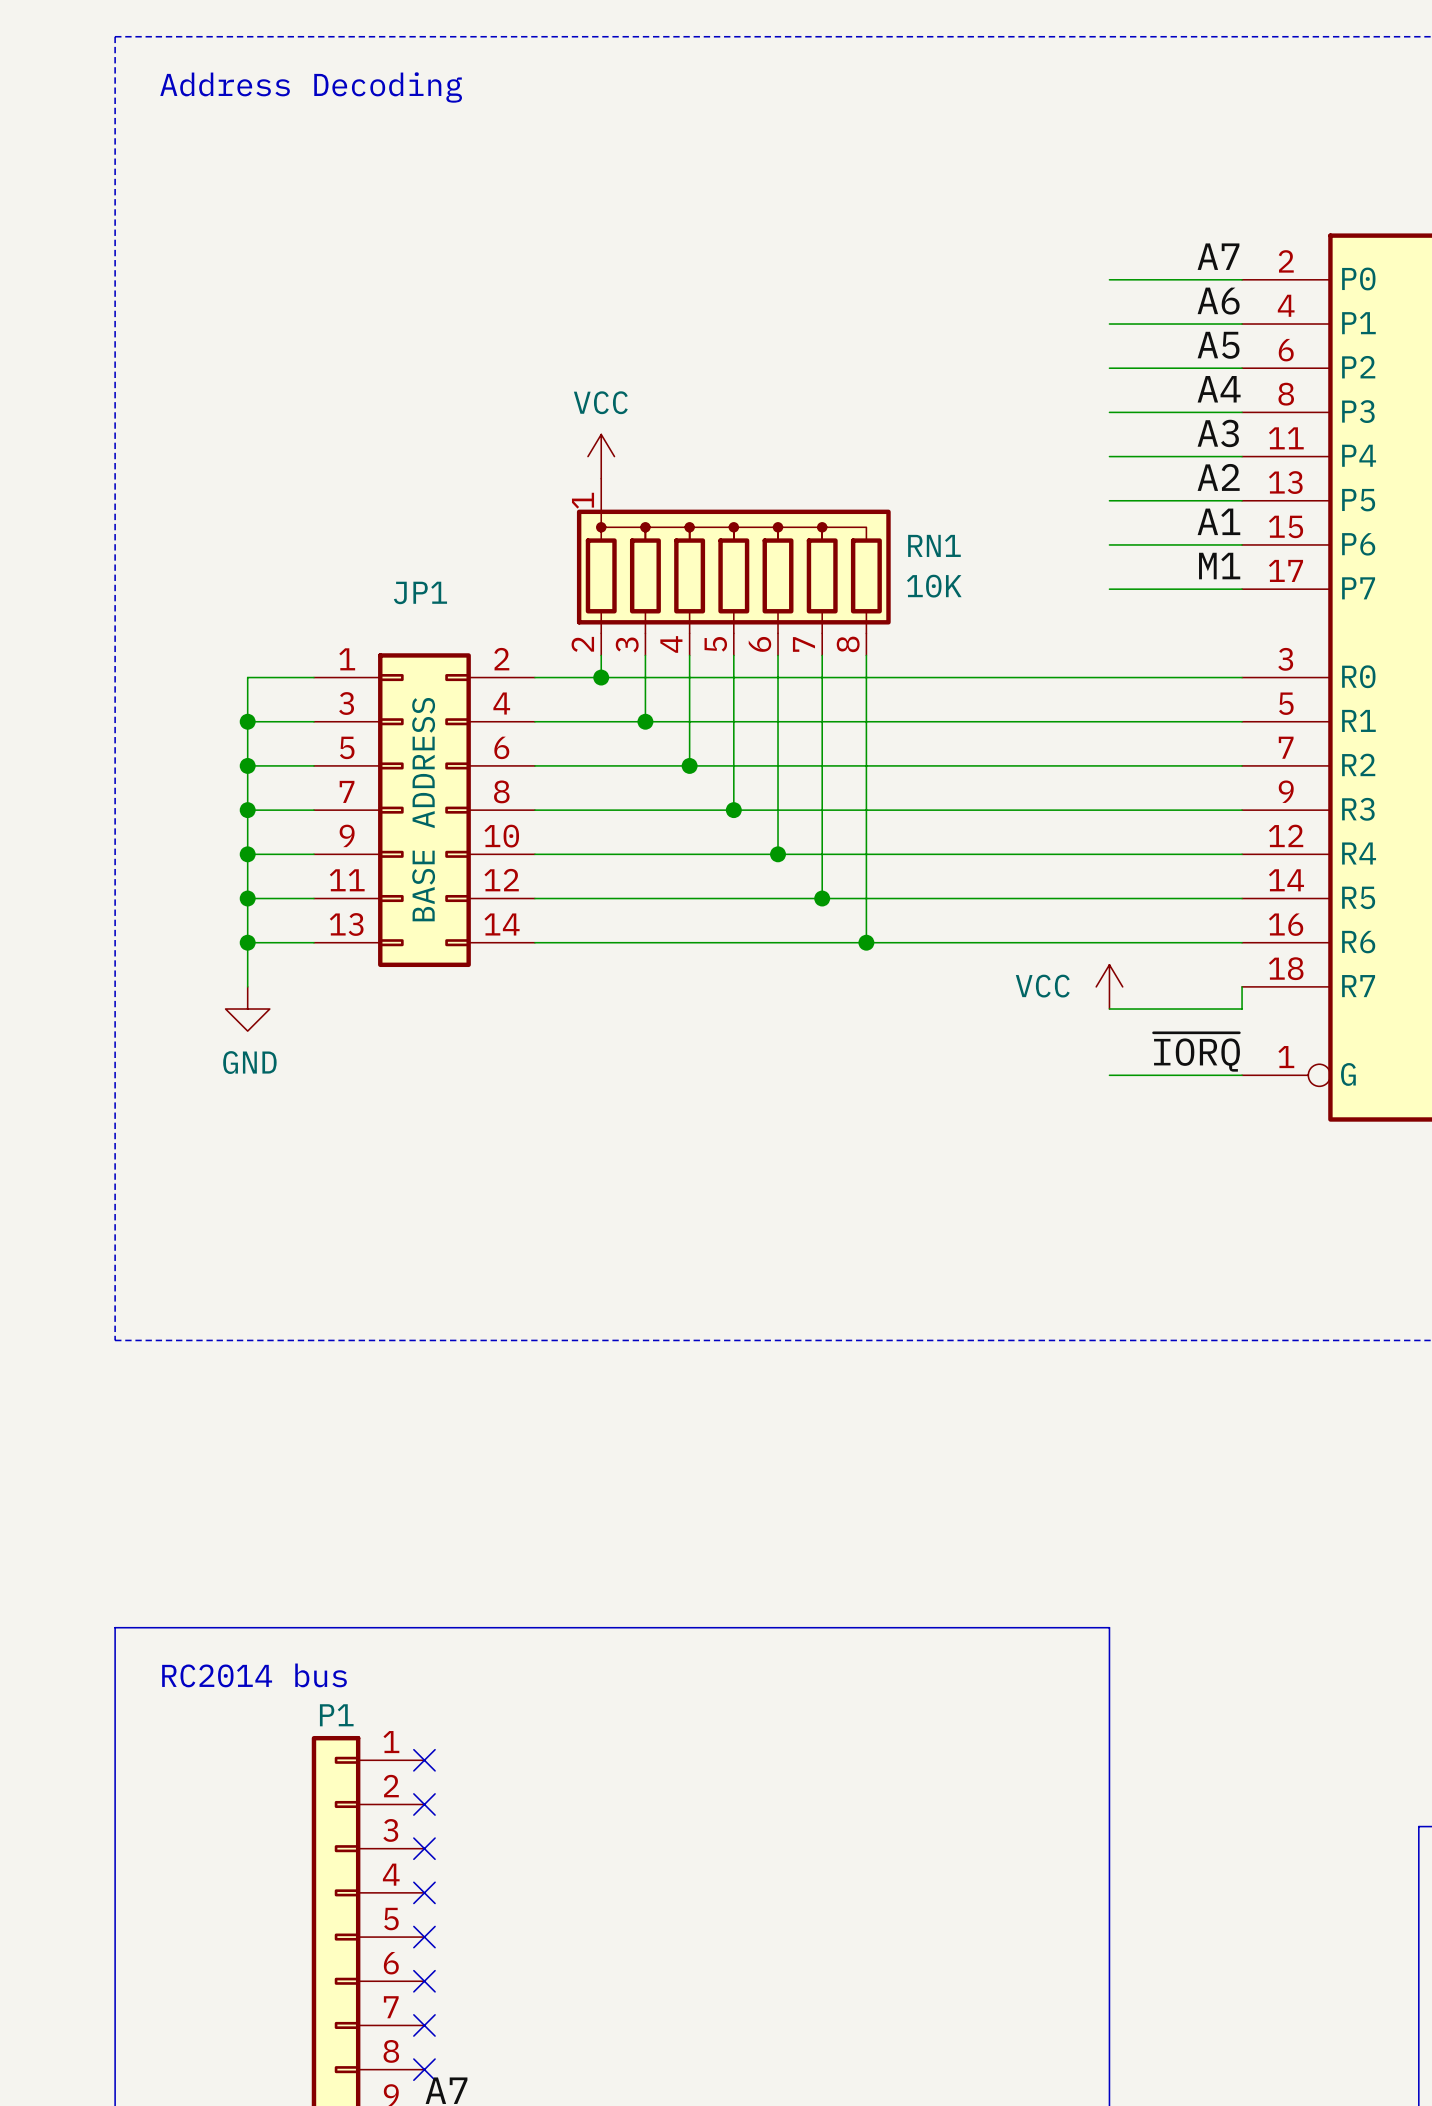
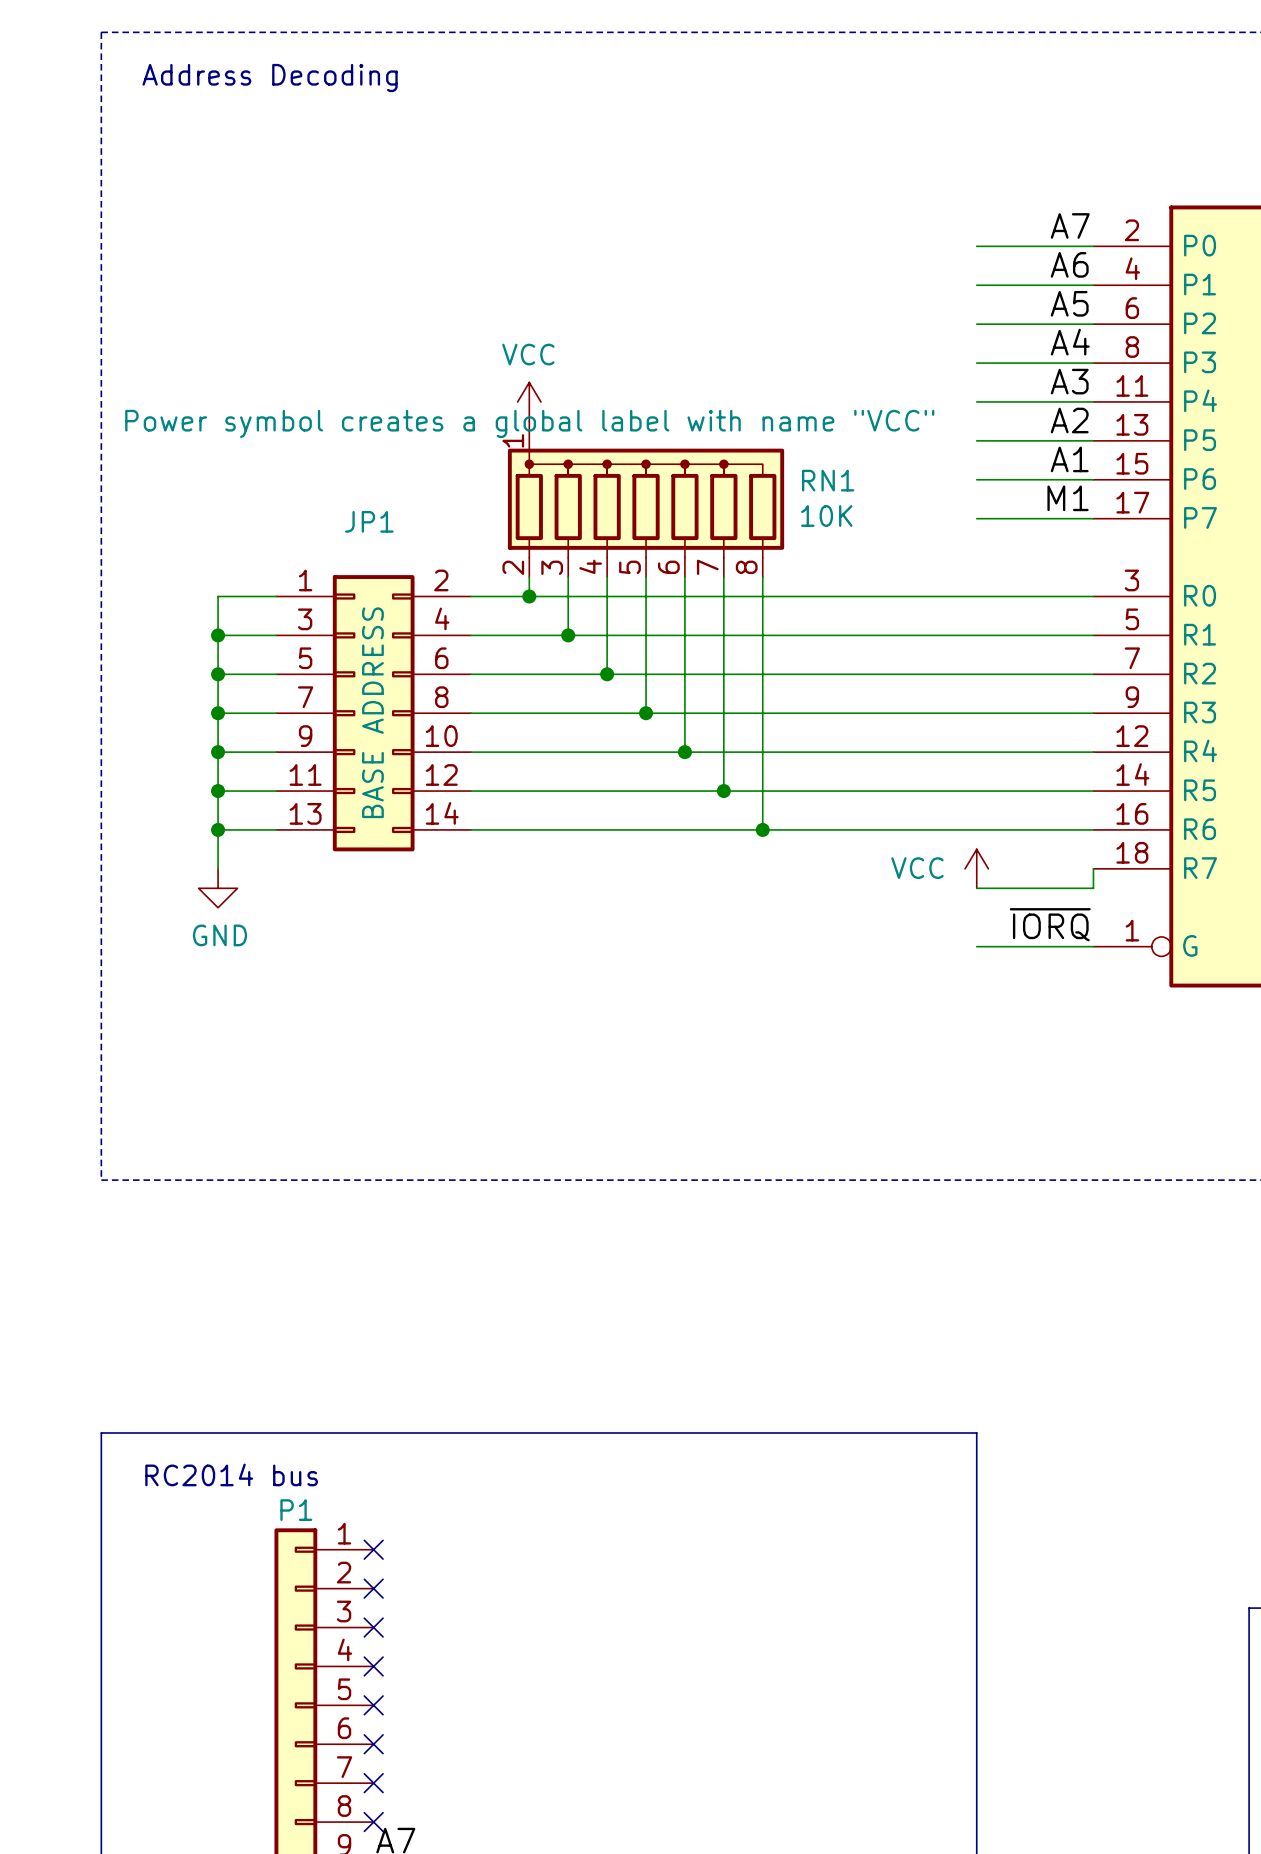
power symbol text: none -> Power symbol creates a global label with name "VCC" (529, 423)

